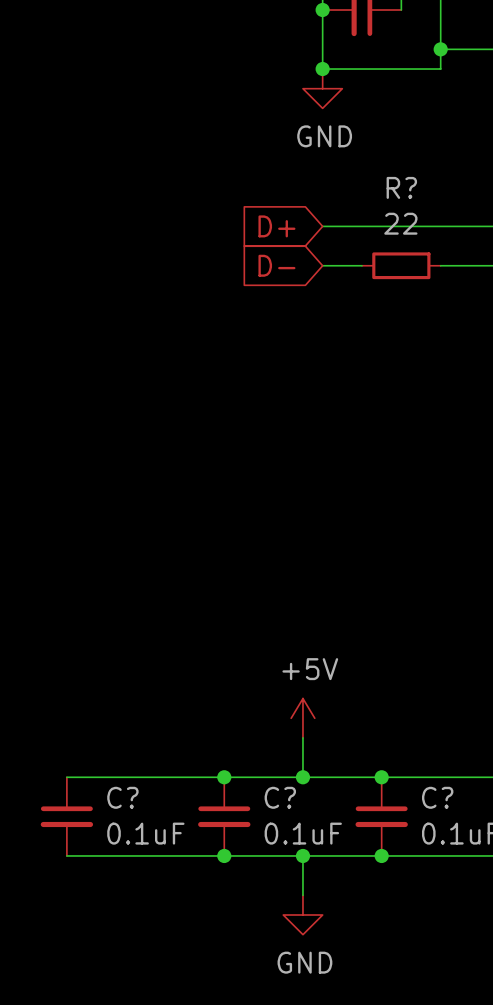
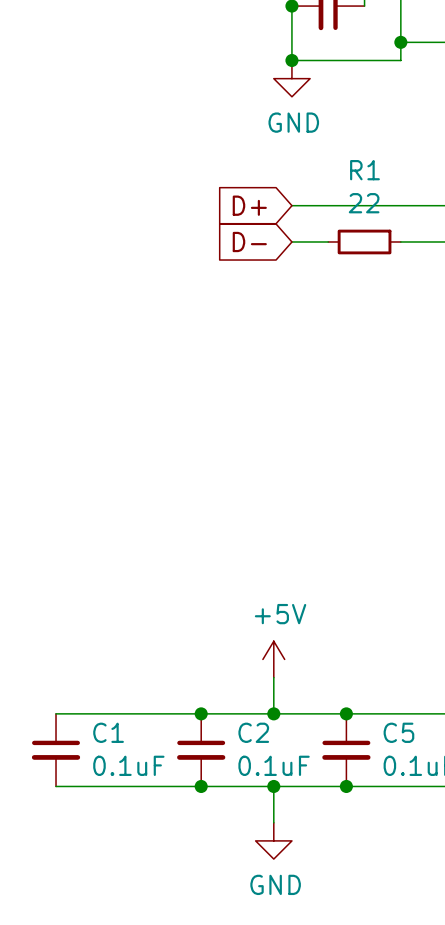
R? name: R? (401, 187) -> R1 (364, 170)
C? name: C? (122, 797) -> C1 (108, 732)
C? name: C? (280, 797) -> C2 (253, 732)
C? name: C? (437, 797) -> C5 (398, 732)

